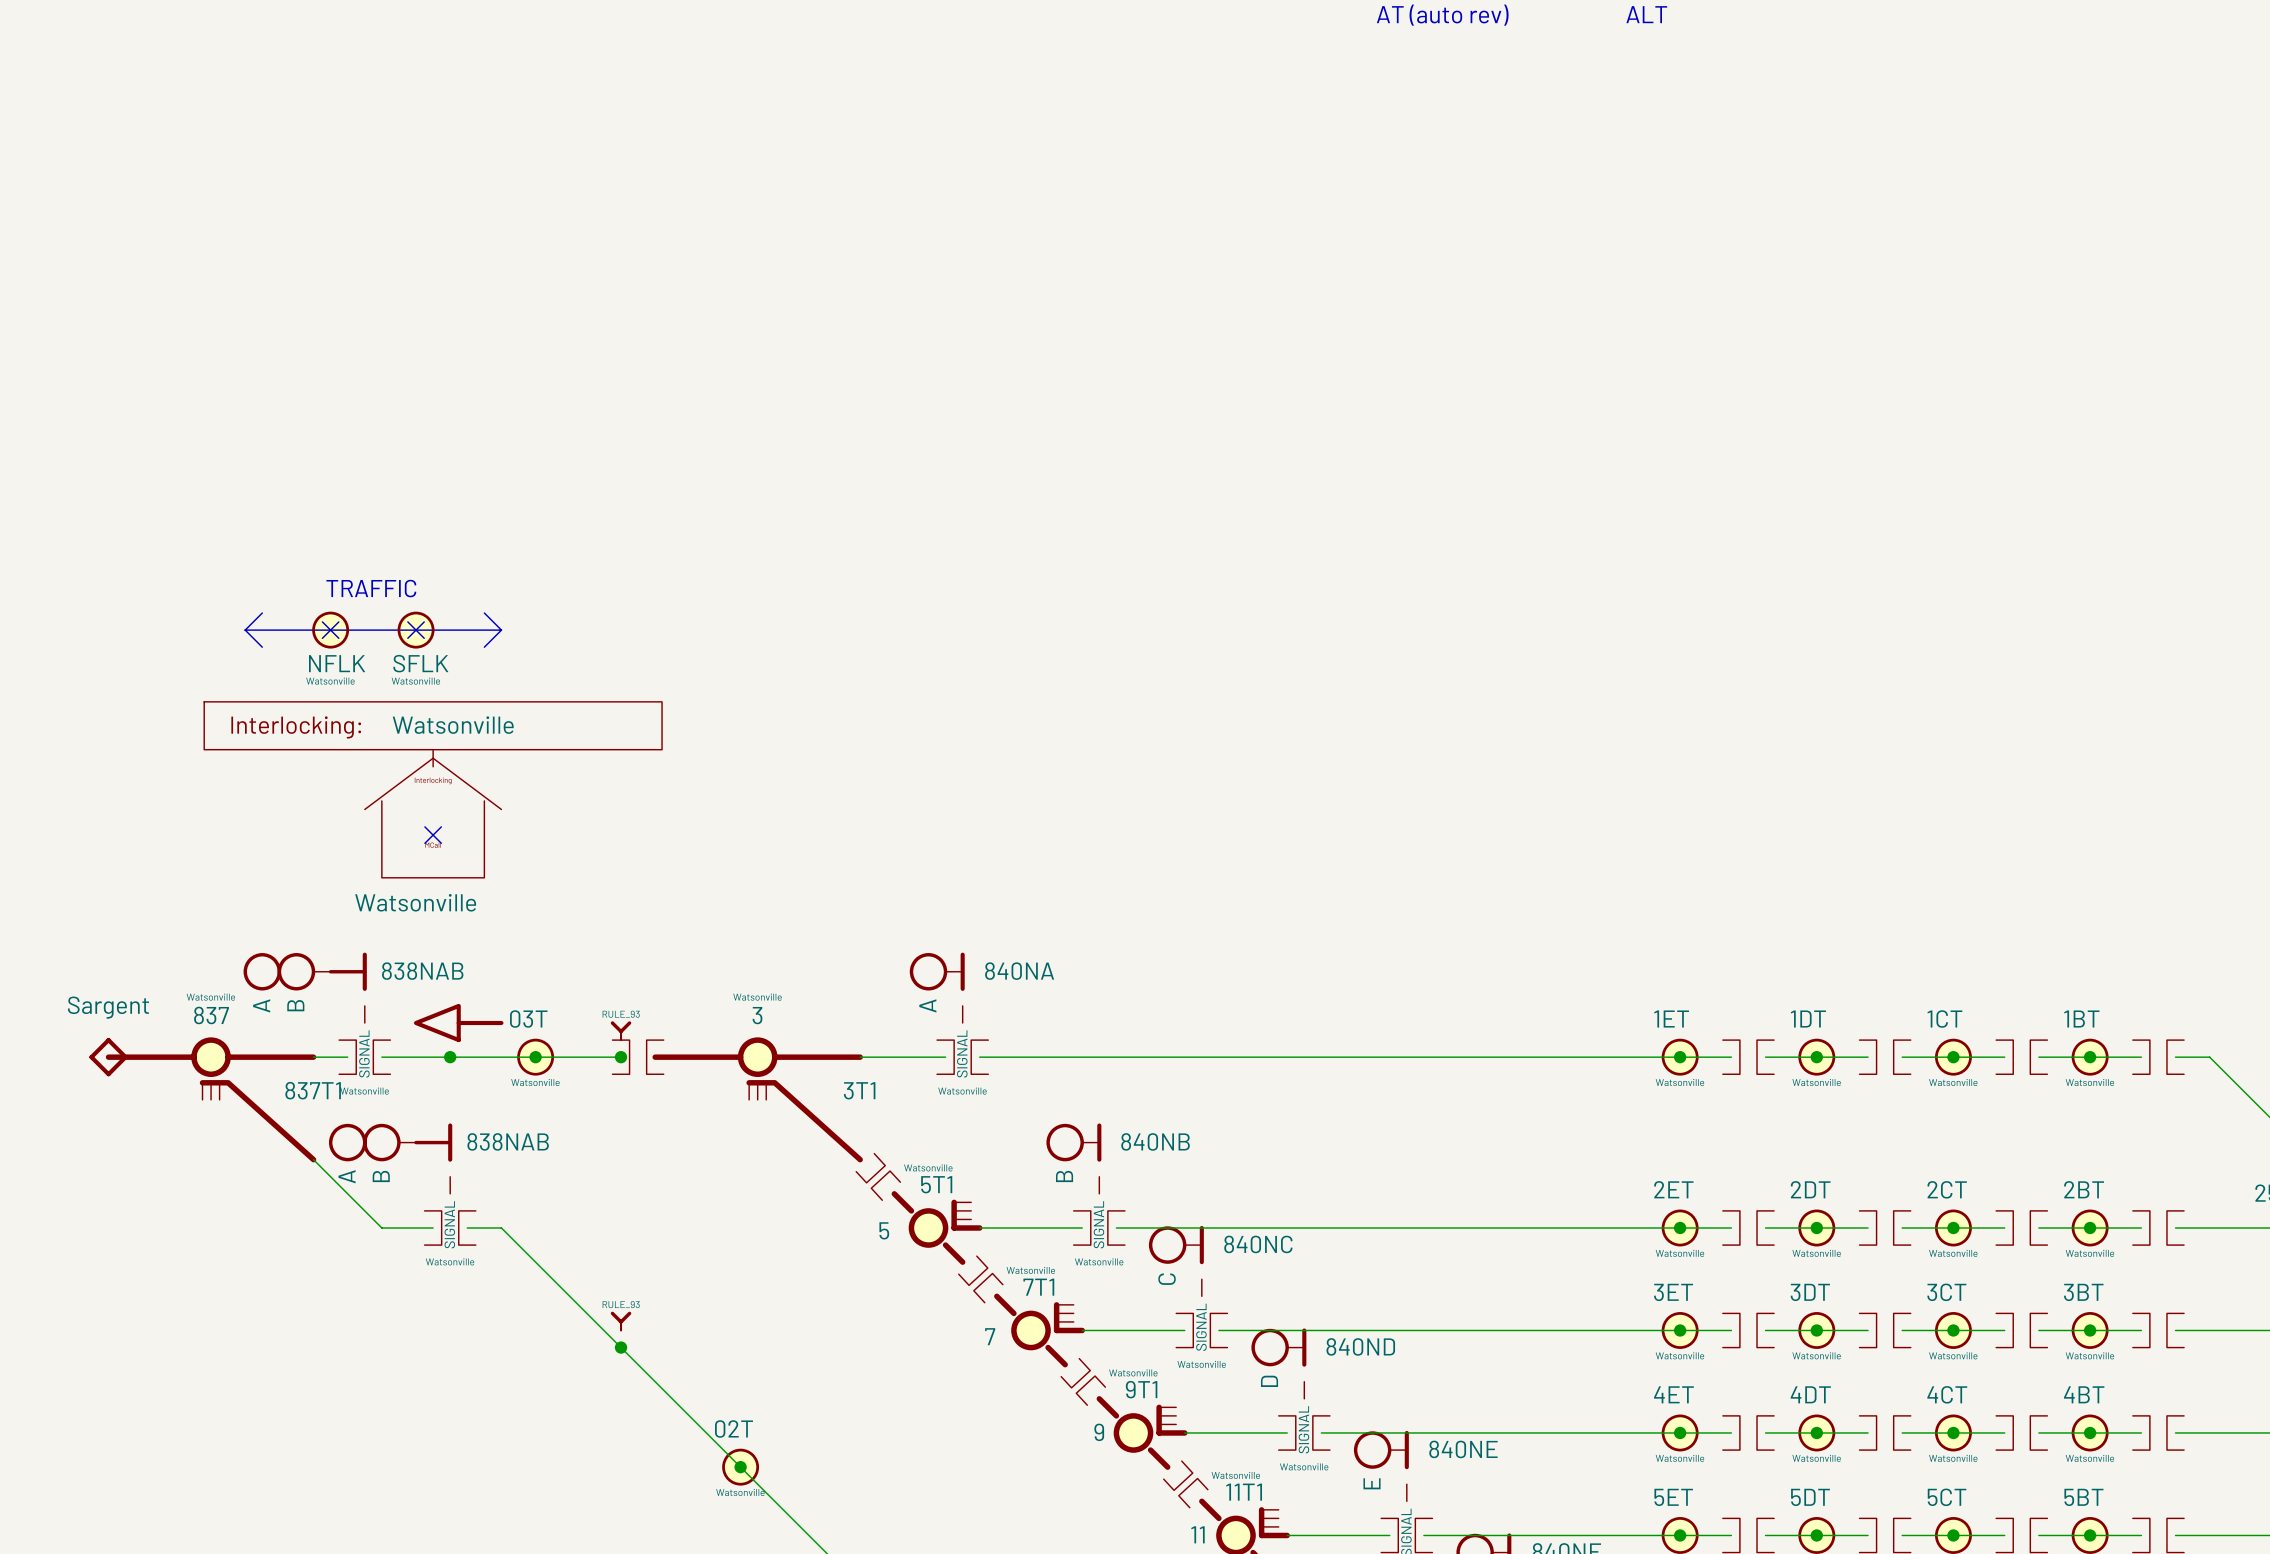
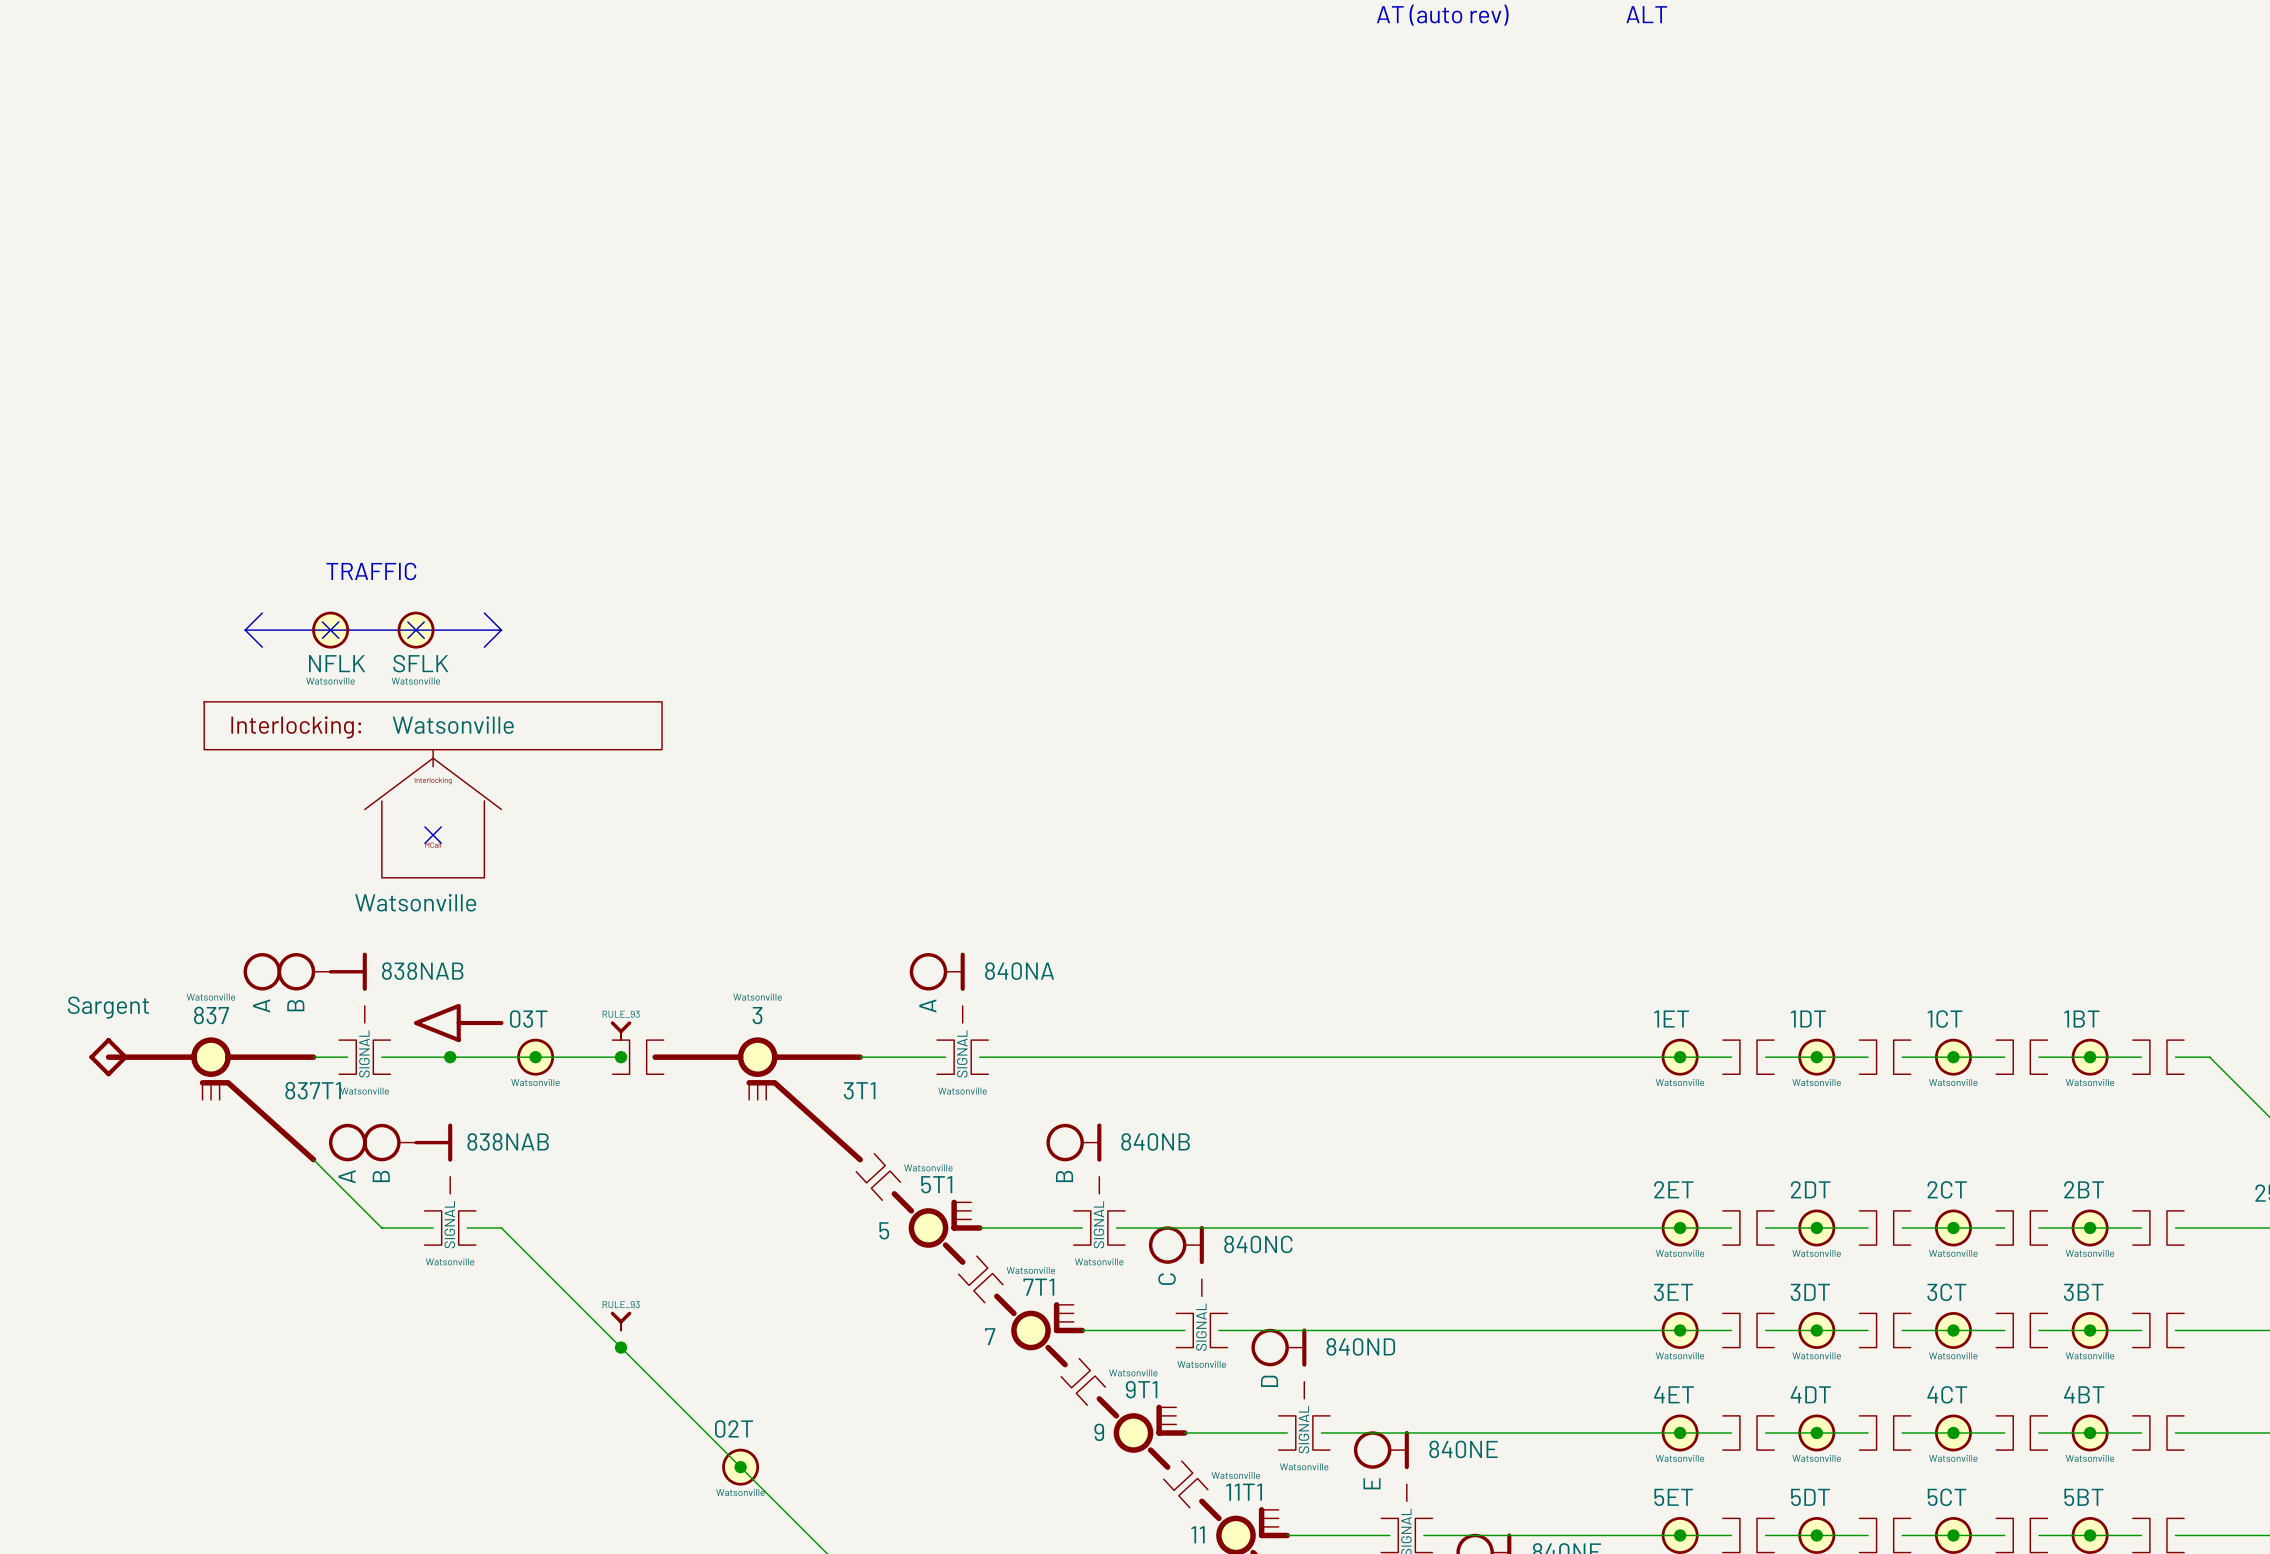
text position: TRAFFIC (371, 588) -> TRAFFIC (371, 571)

